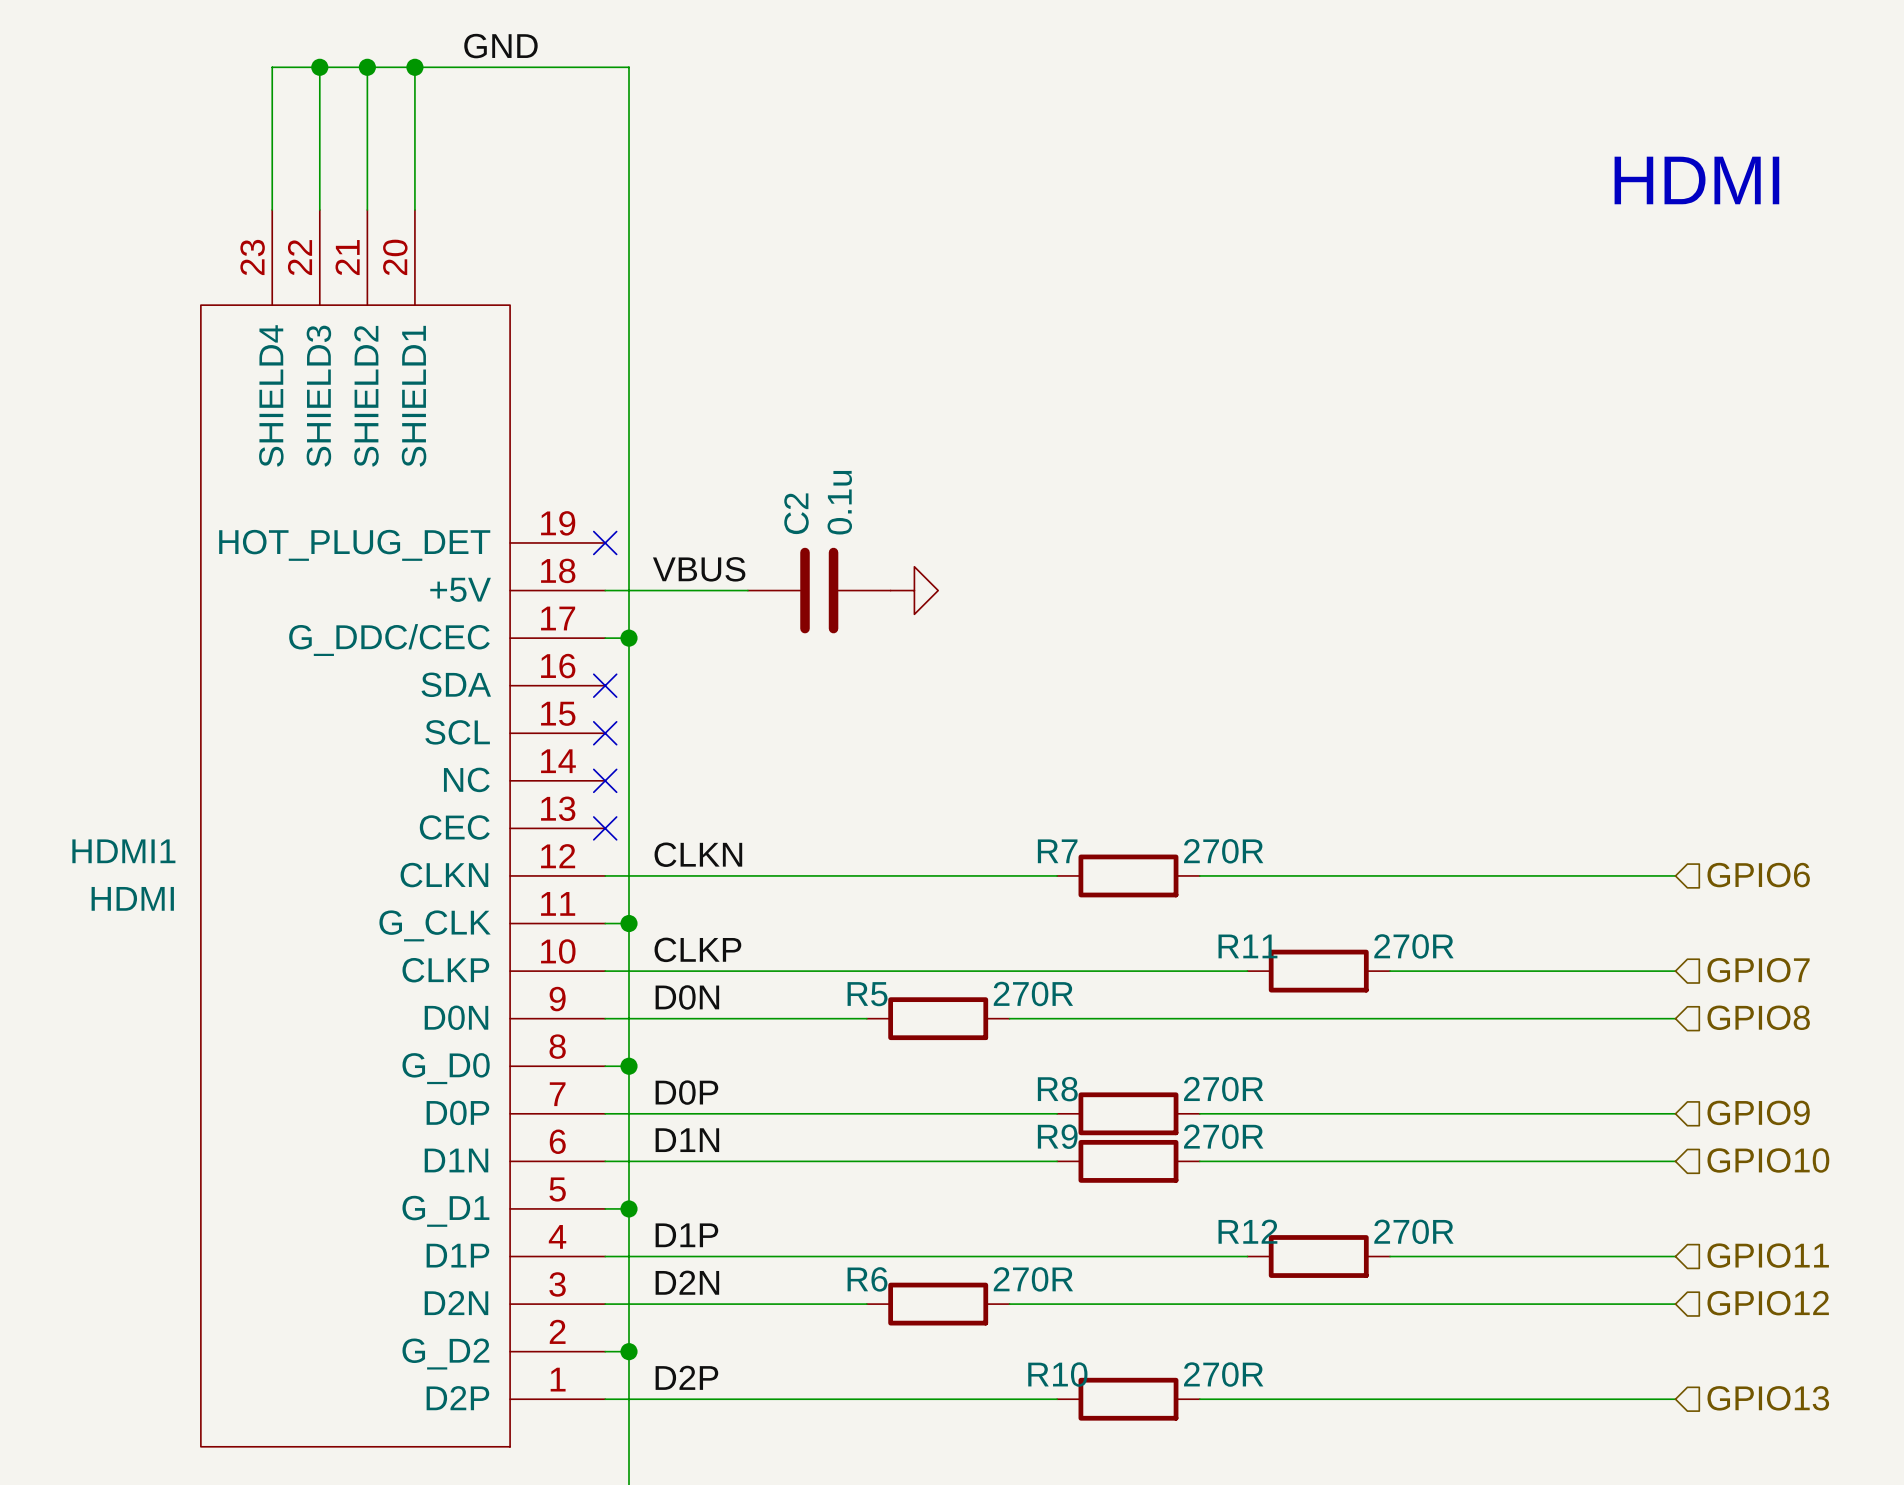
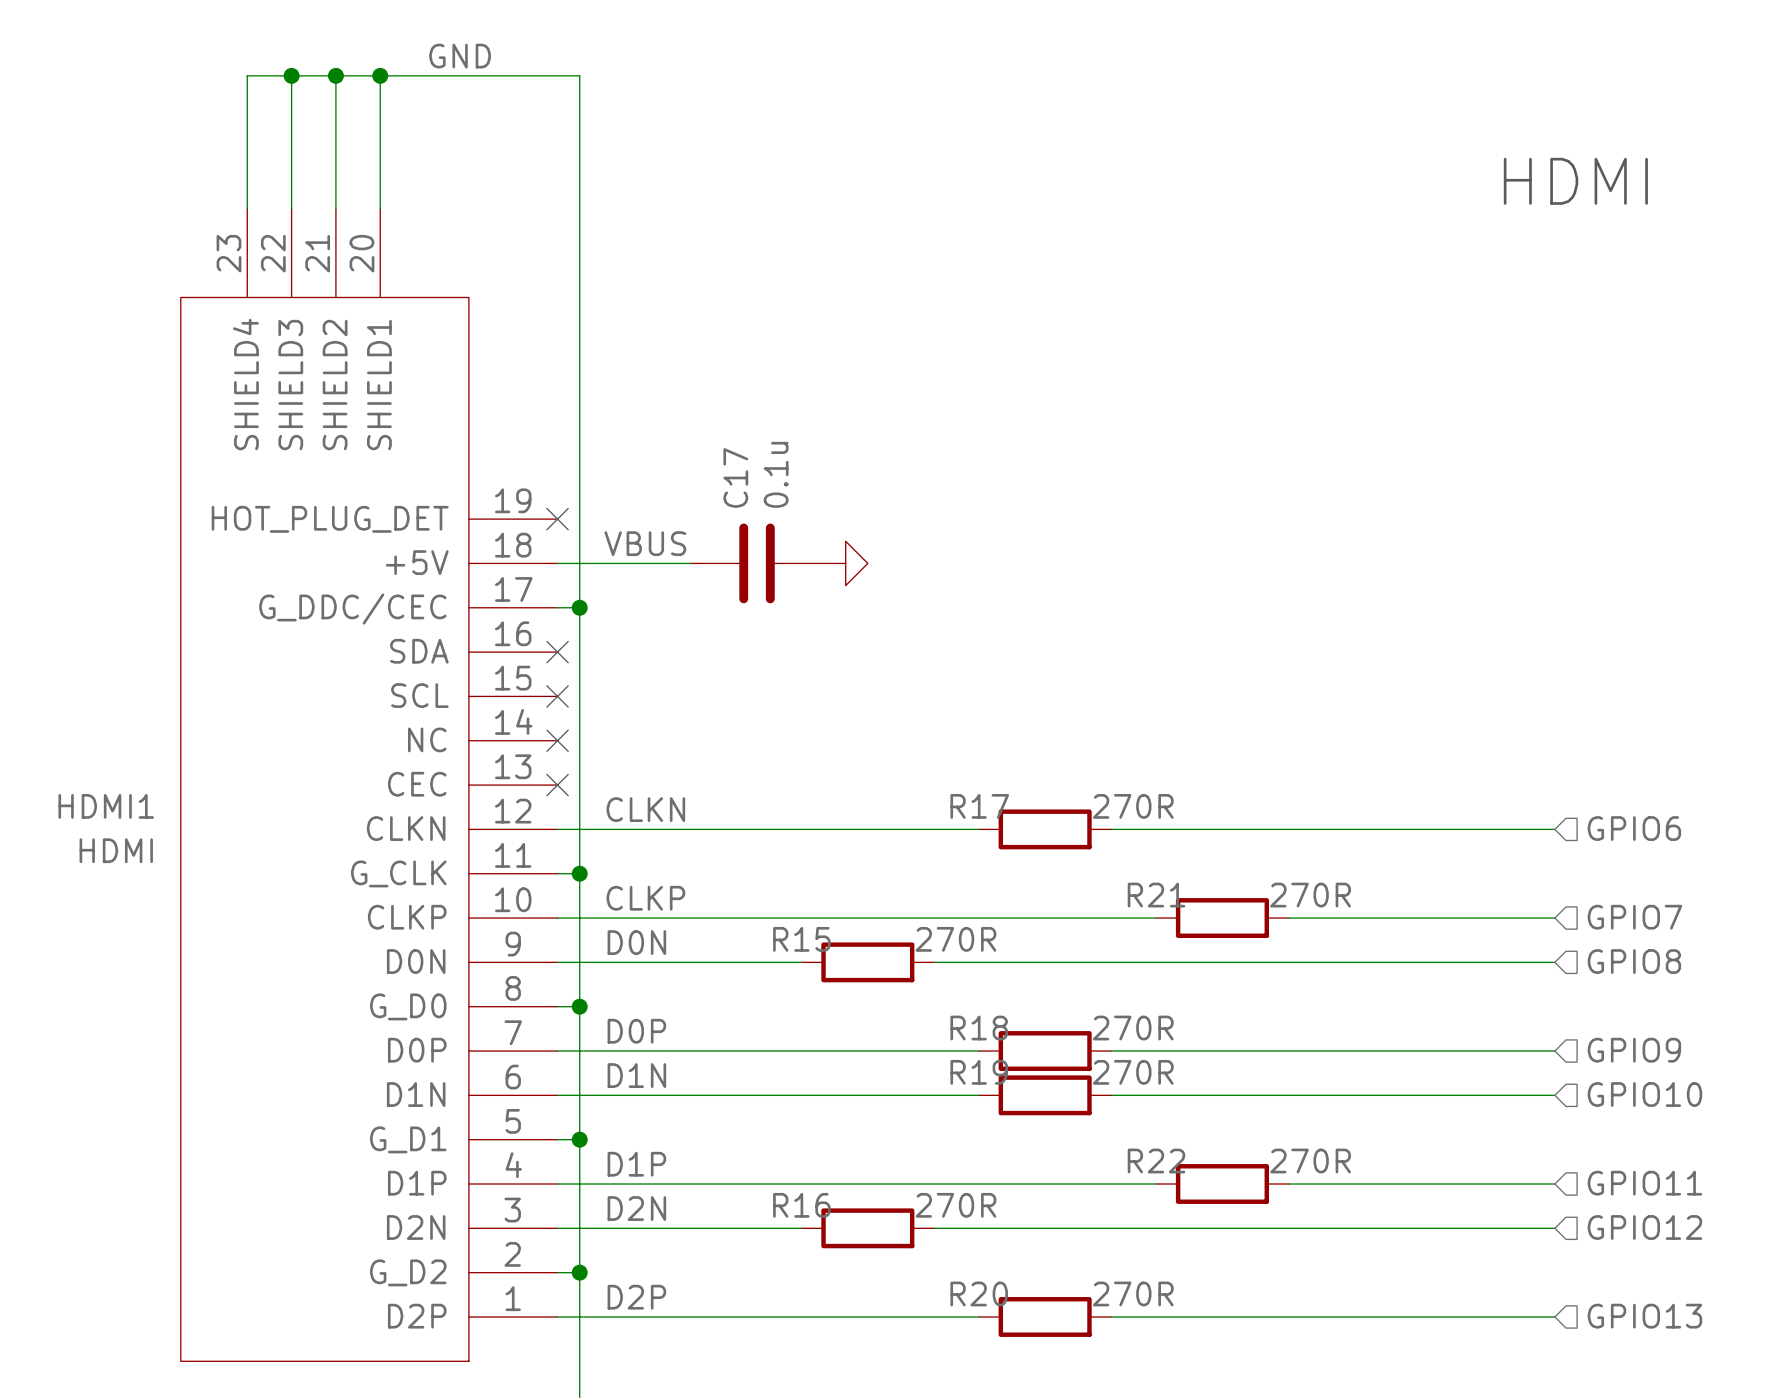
C2 name: C2 (796, 513) -> C17 (735, 477)
R7 name: R7 (1057, 851) -> R17 (979, 806)
R11 name: R11 (1247, 946) -> R21 (1156, 895)
R5 name: R5 (867, 994) -> R15 (801, 939)
R8 name: R8 (1057, 1089) -> R18 (979, 1028)
R9 name: R9 (1057, 1136) -> R19 (979, 1072)
R12 name: R12 (1247, 1231) -> R22 (1156, 1161)
R6 name: R6 (867, 1279) -> R16 (801, 1205)
R10 name: R10 (1057, 1374) -> R20 (979, 1293)

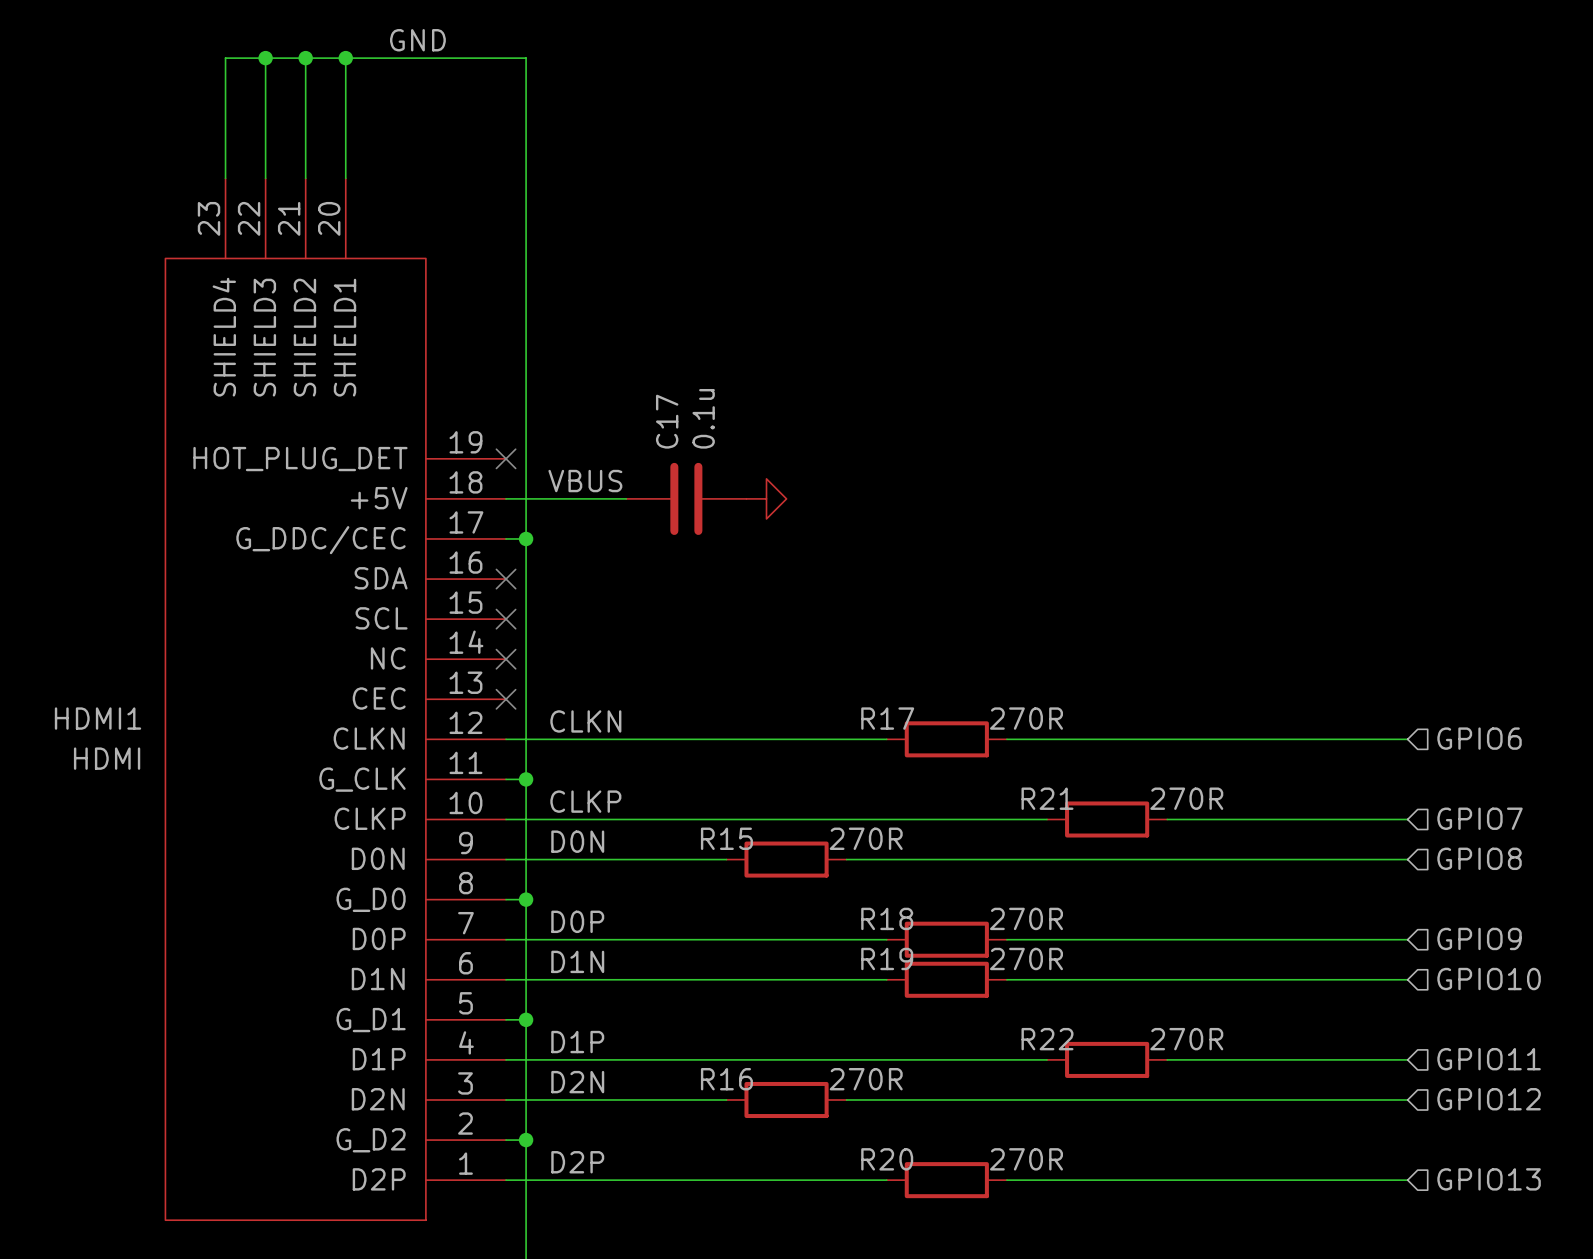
text: HDMI (1575, 181) -> none

